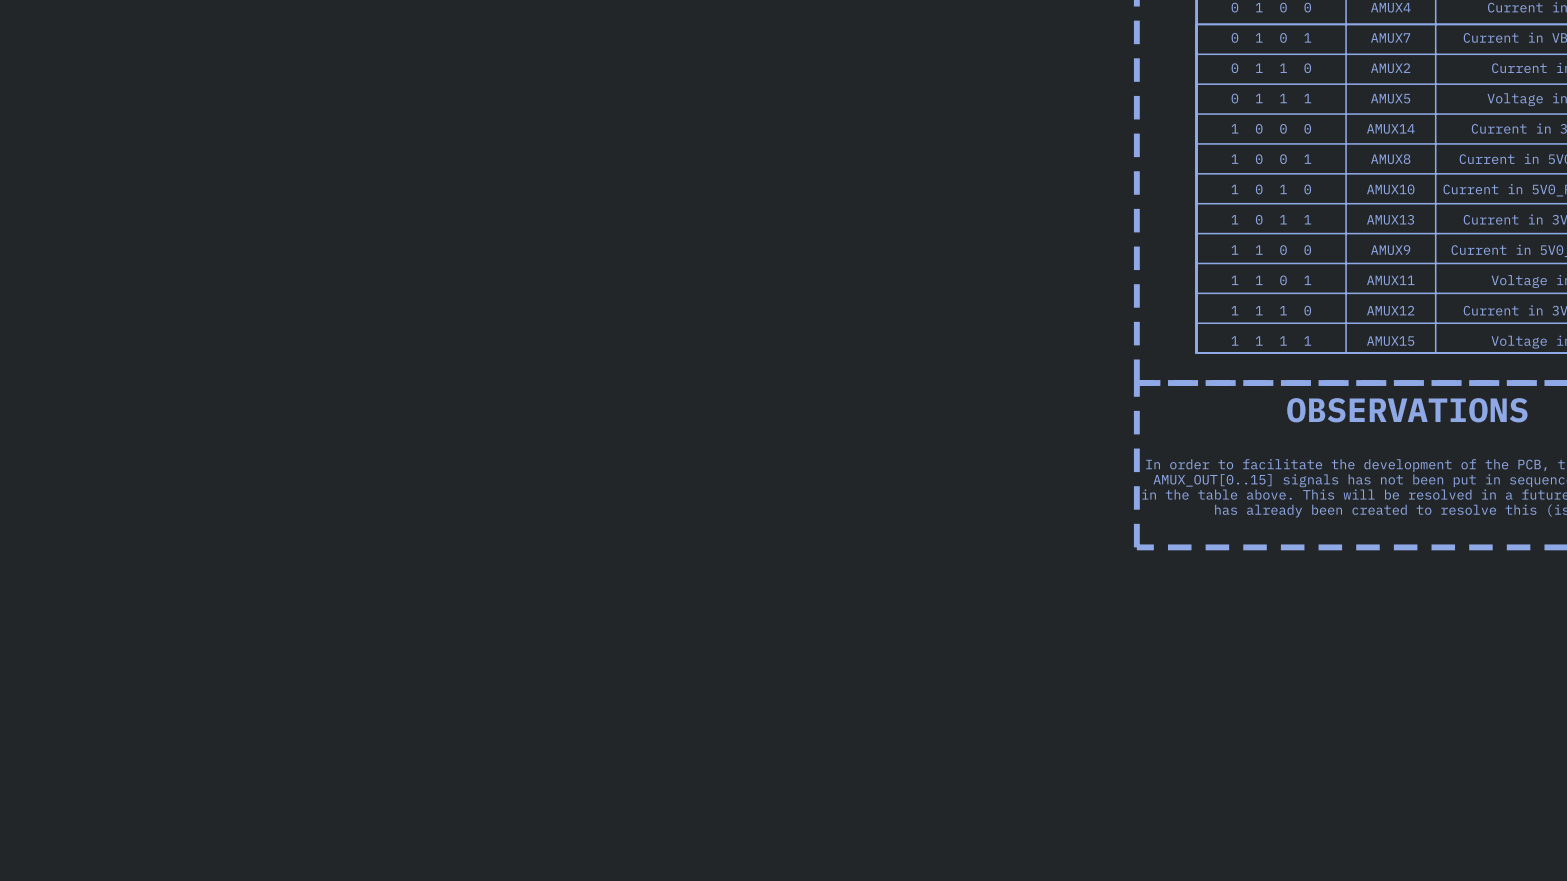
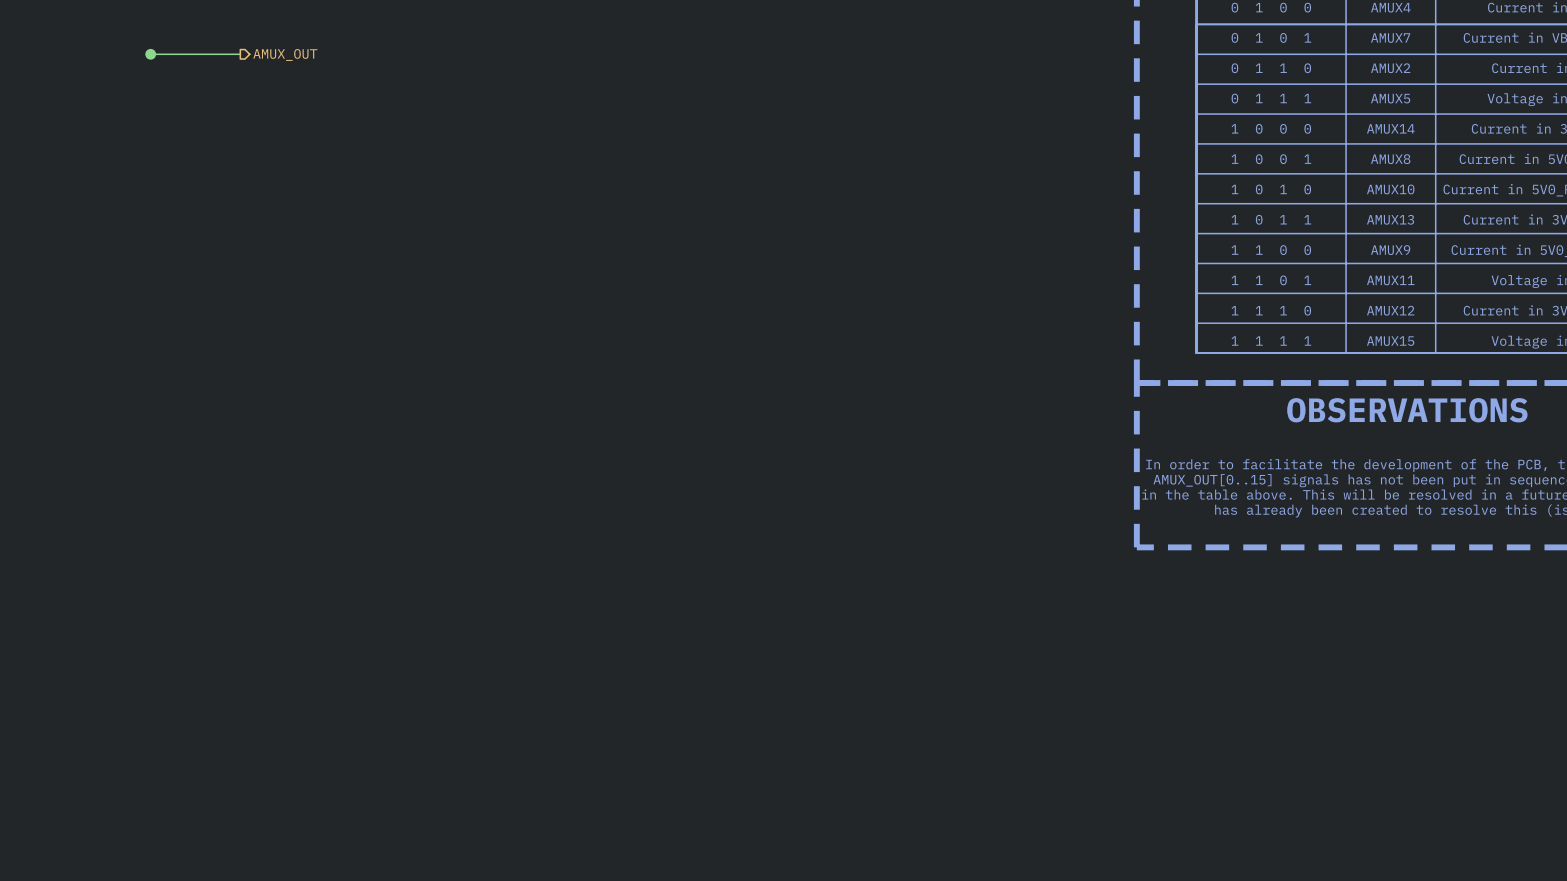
wire: none -> (150, 54) (240, 54)
junction: none -> (150, 54)
hierarchical label: none -> AMUX_OUT (285, 54)

